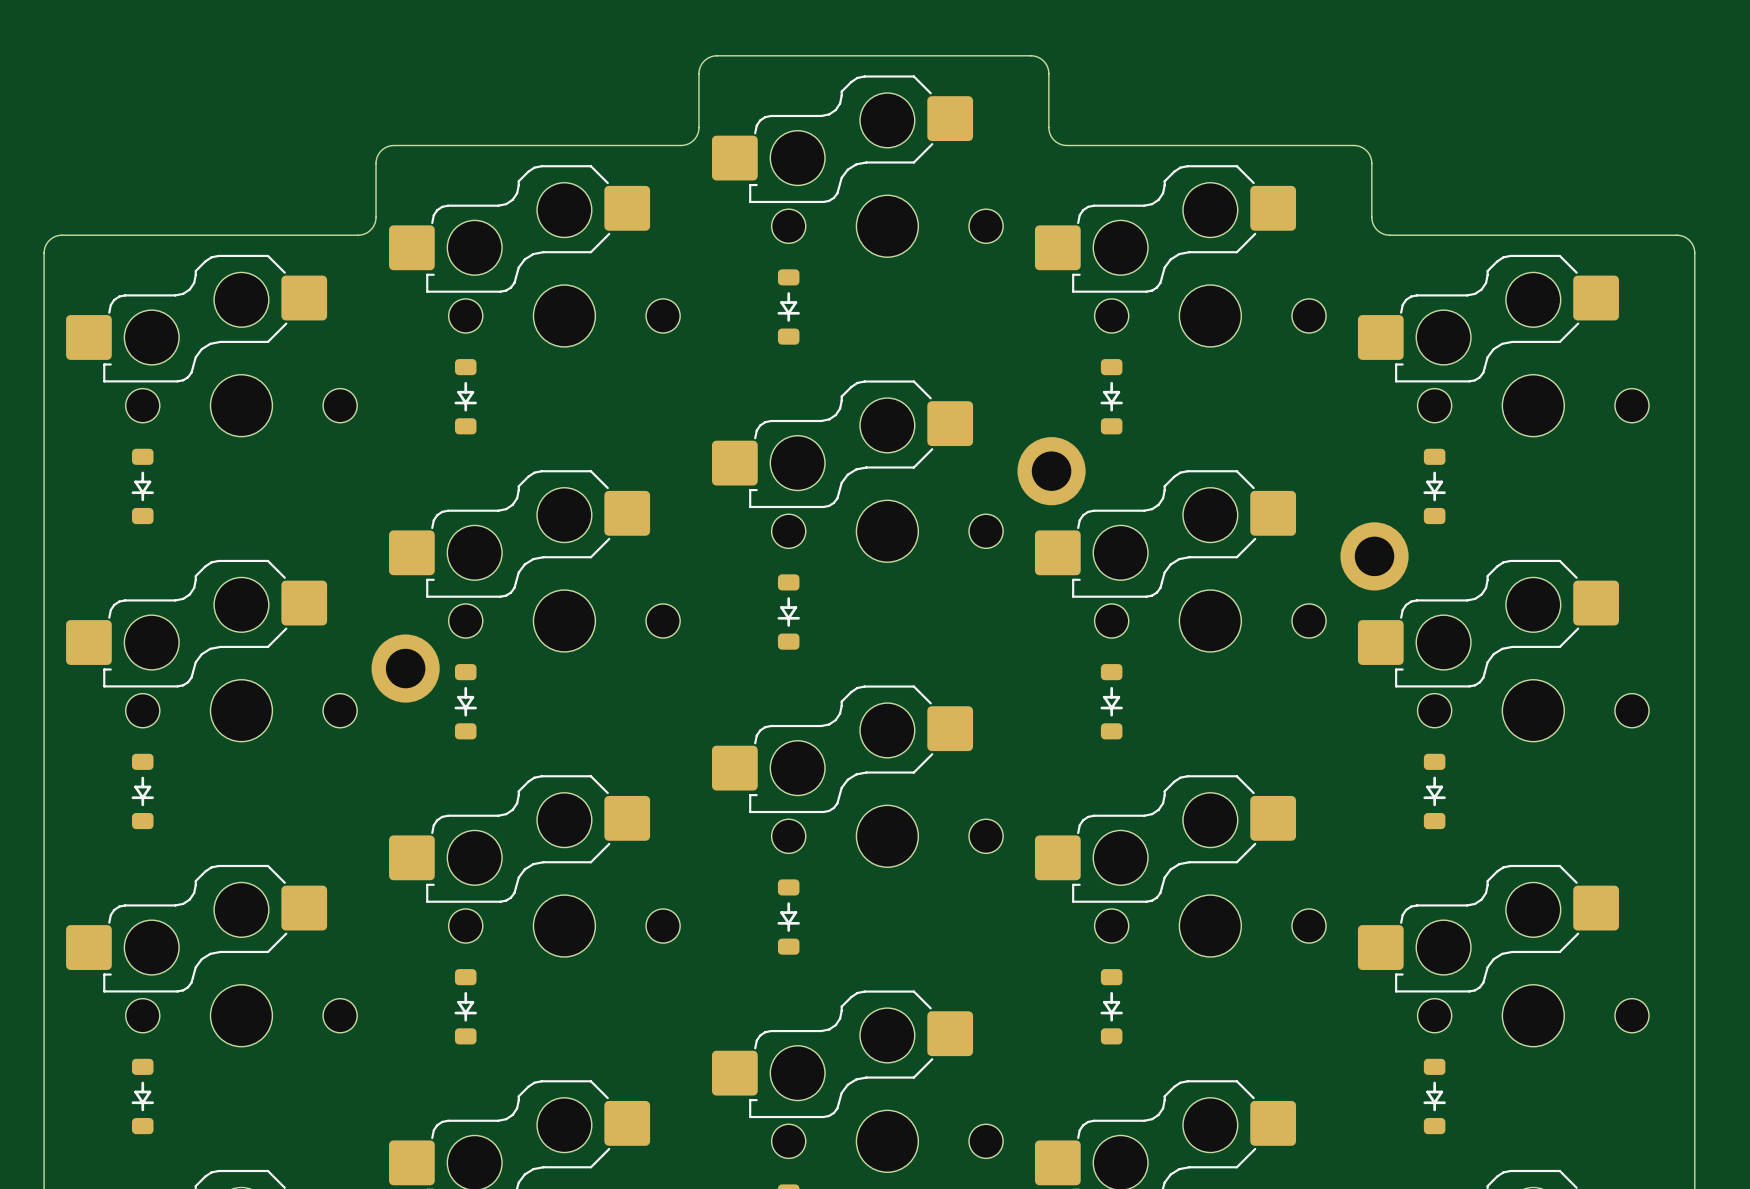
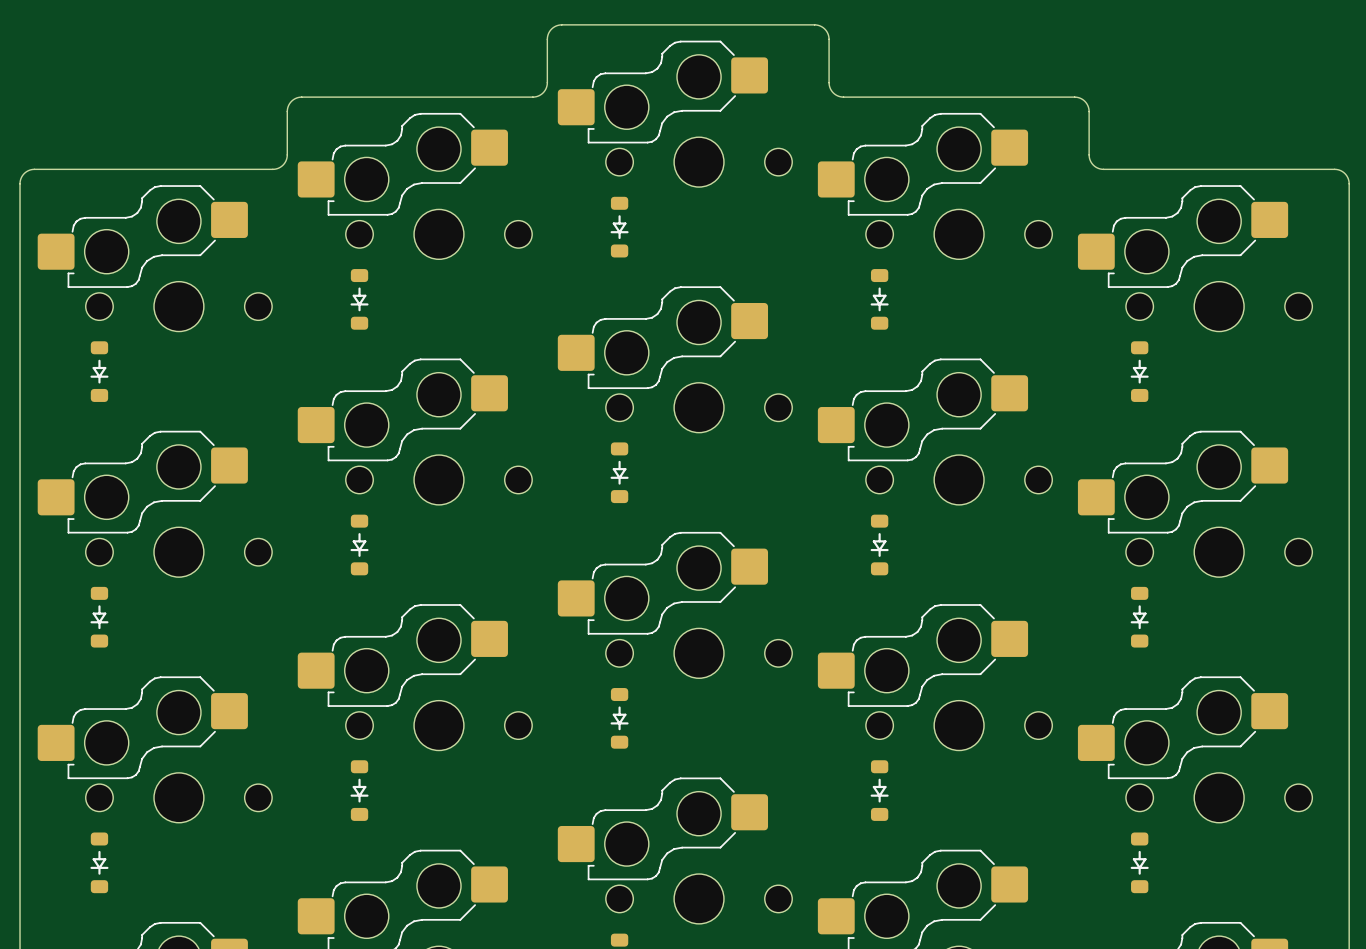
part: (1051, 471) -> none
part: (1374, 556) -> none
part: (405, 668) -> none

